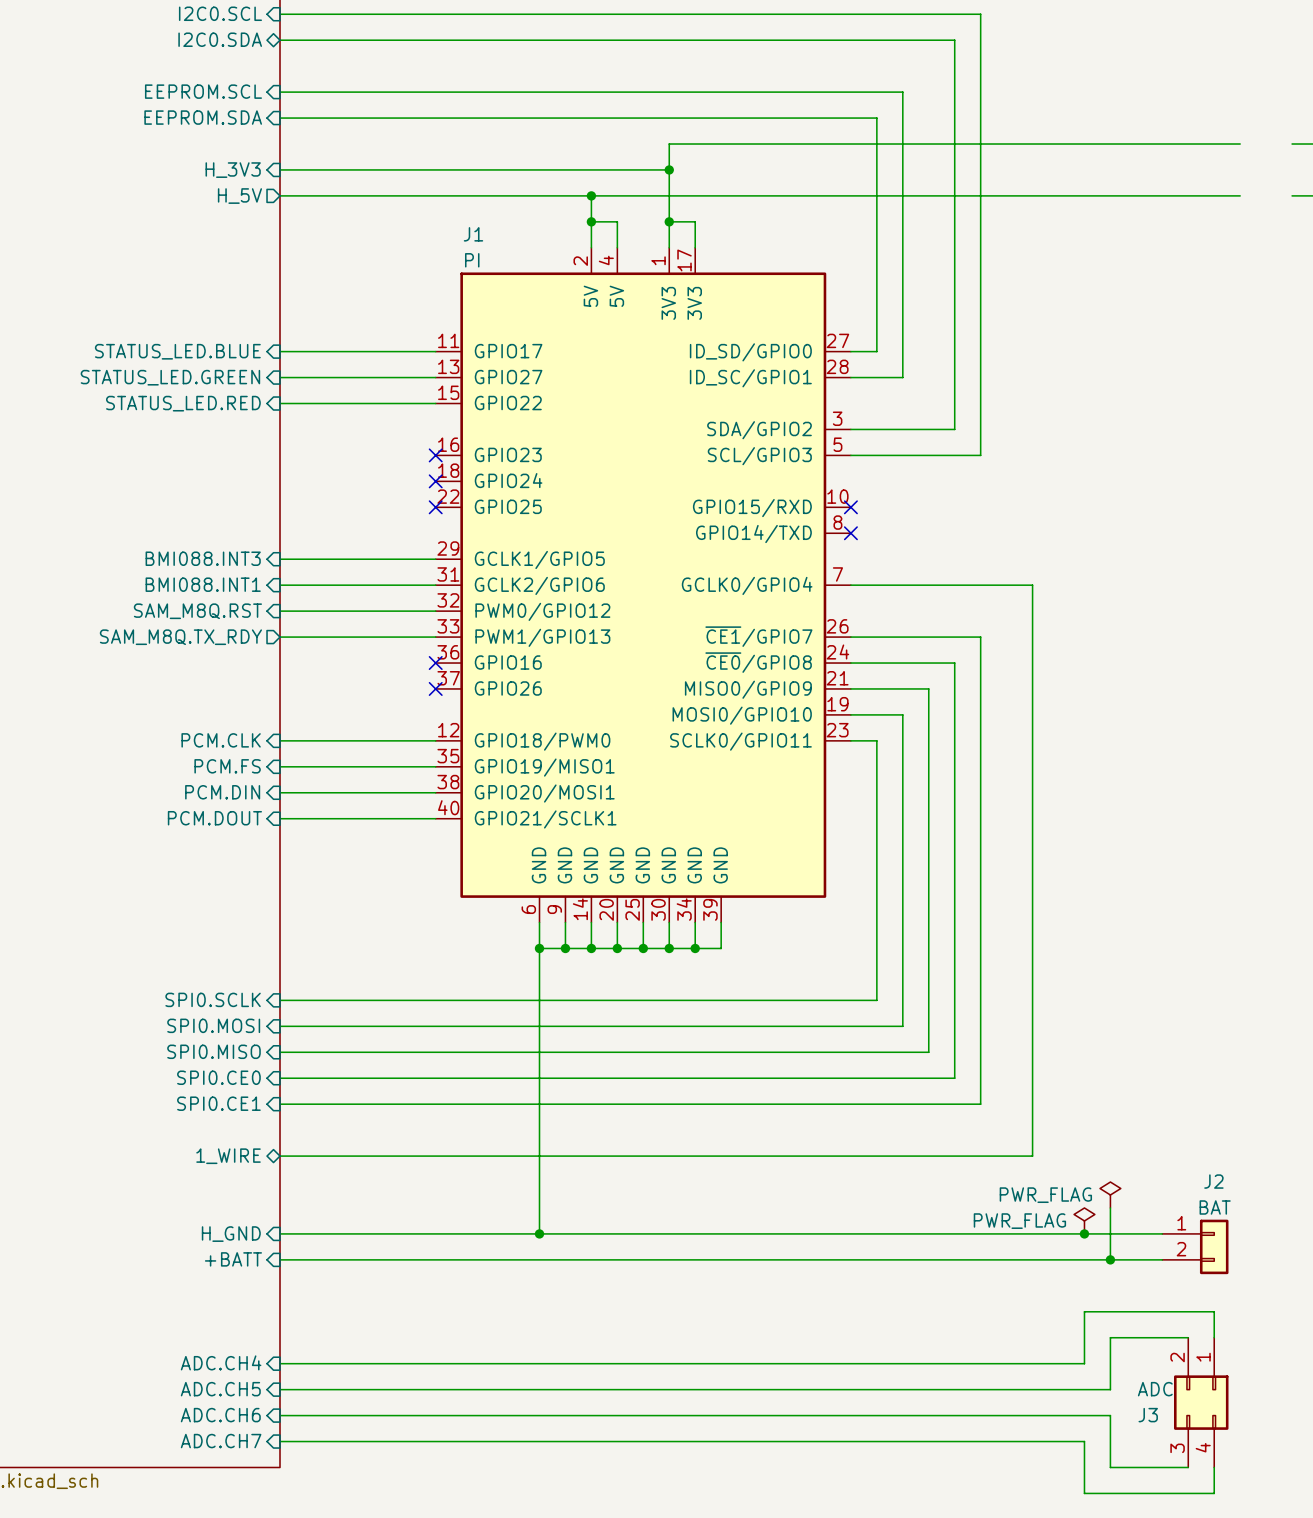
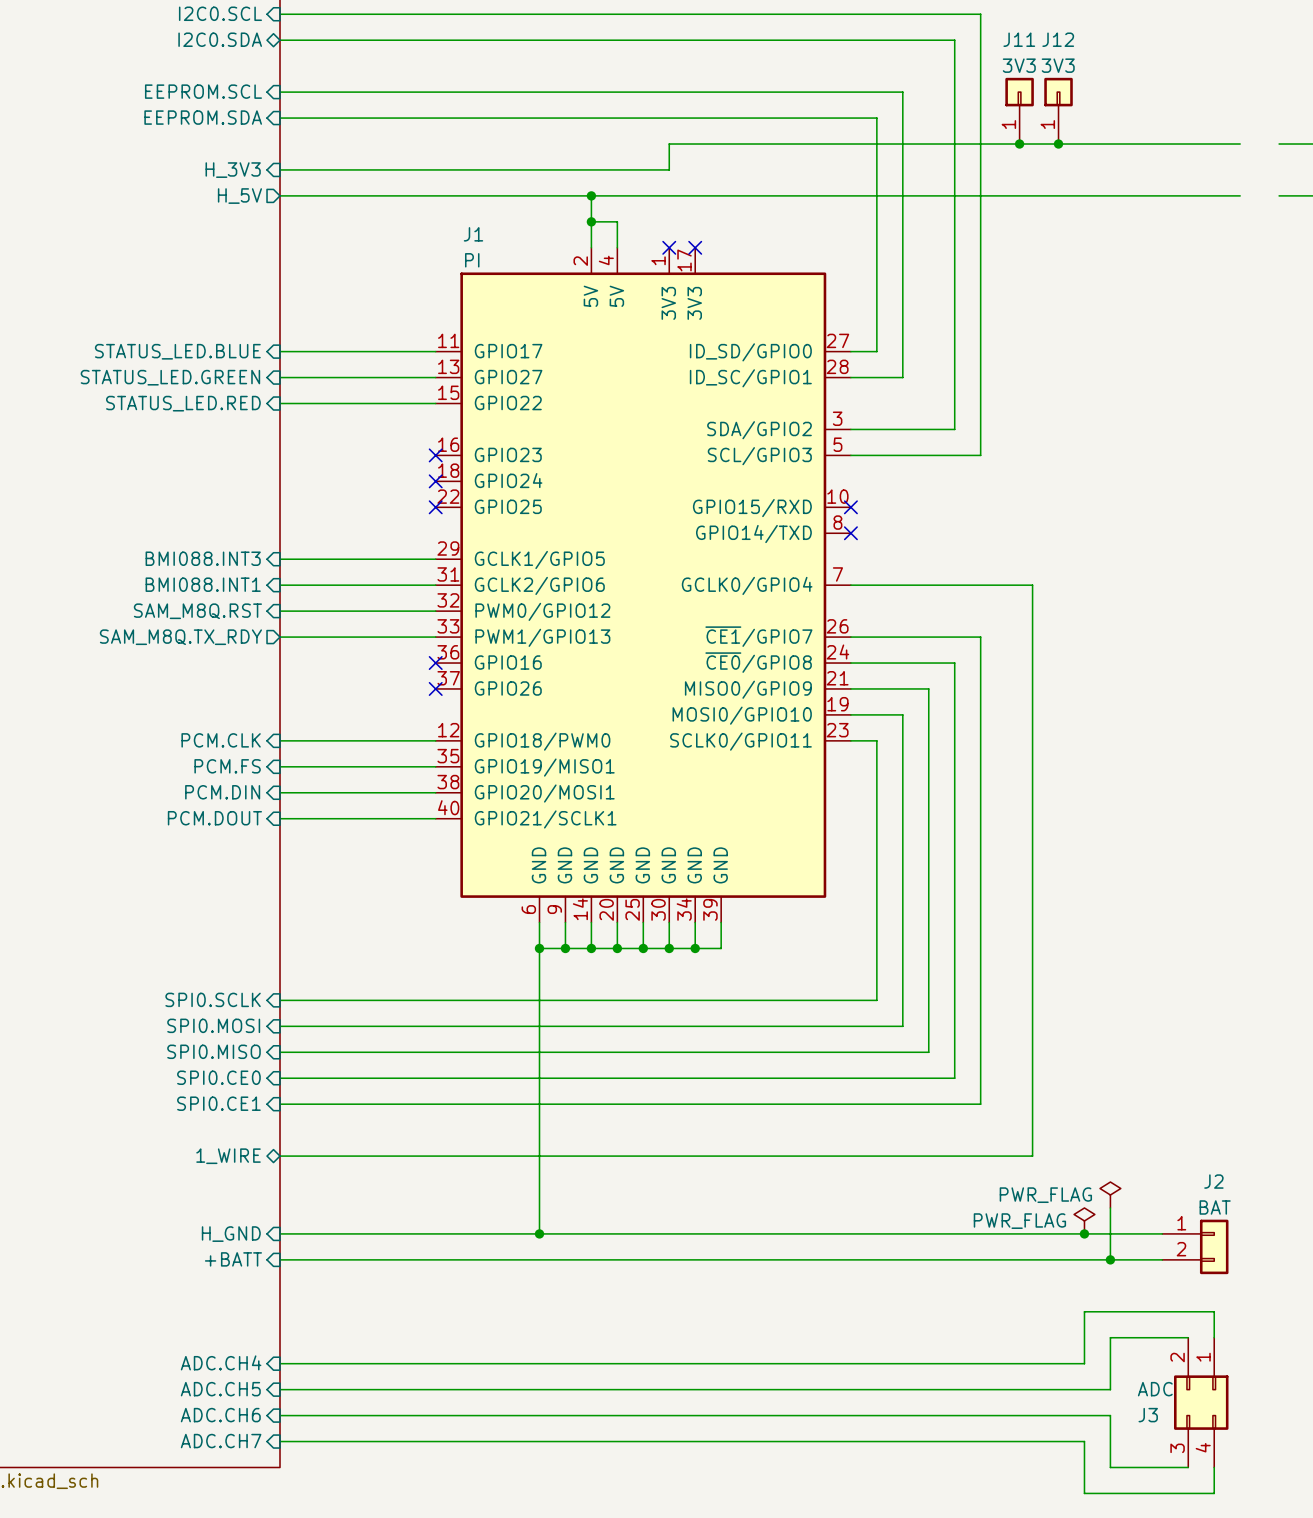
J11: none -> 3V3 (1019, 110)
J12: none -> 3V3 (1058, 110)
junction: none -> (1019, 144)
junction: none -> (1058, 144)
wire: none -> (1279, 144) (1292, 144)
wire: (669, 169) (669, 247) -> none
junction: (669, 169) -> none
wire: none -> (1279, 195) (1292, 195)
wire: (669, 221) (695, 221) (695, 247) -> none
junction: (669, 221) -> none
no-connect mark: none -> (669, 247)
no-connect mark: none -> (695, 247)

